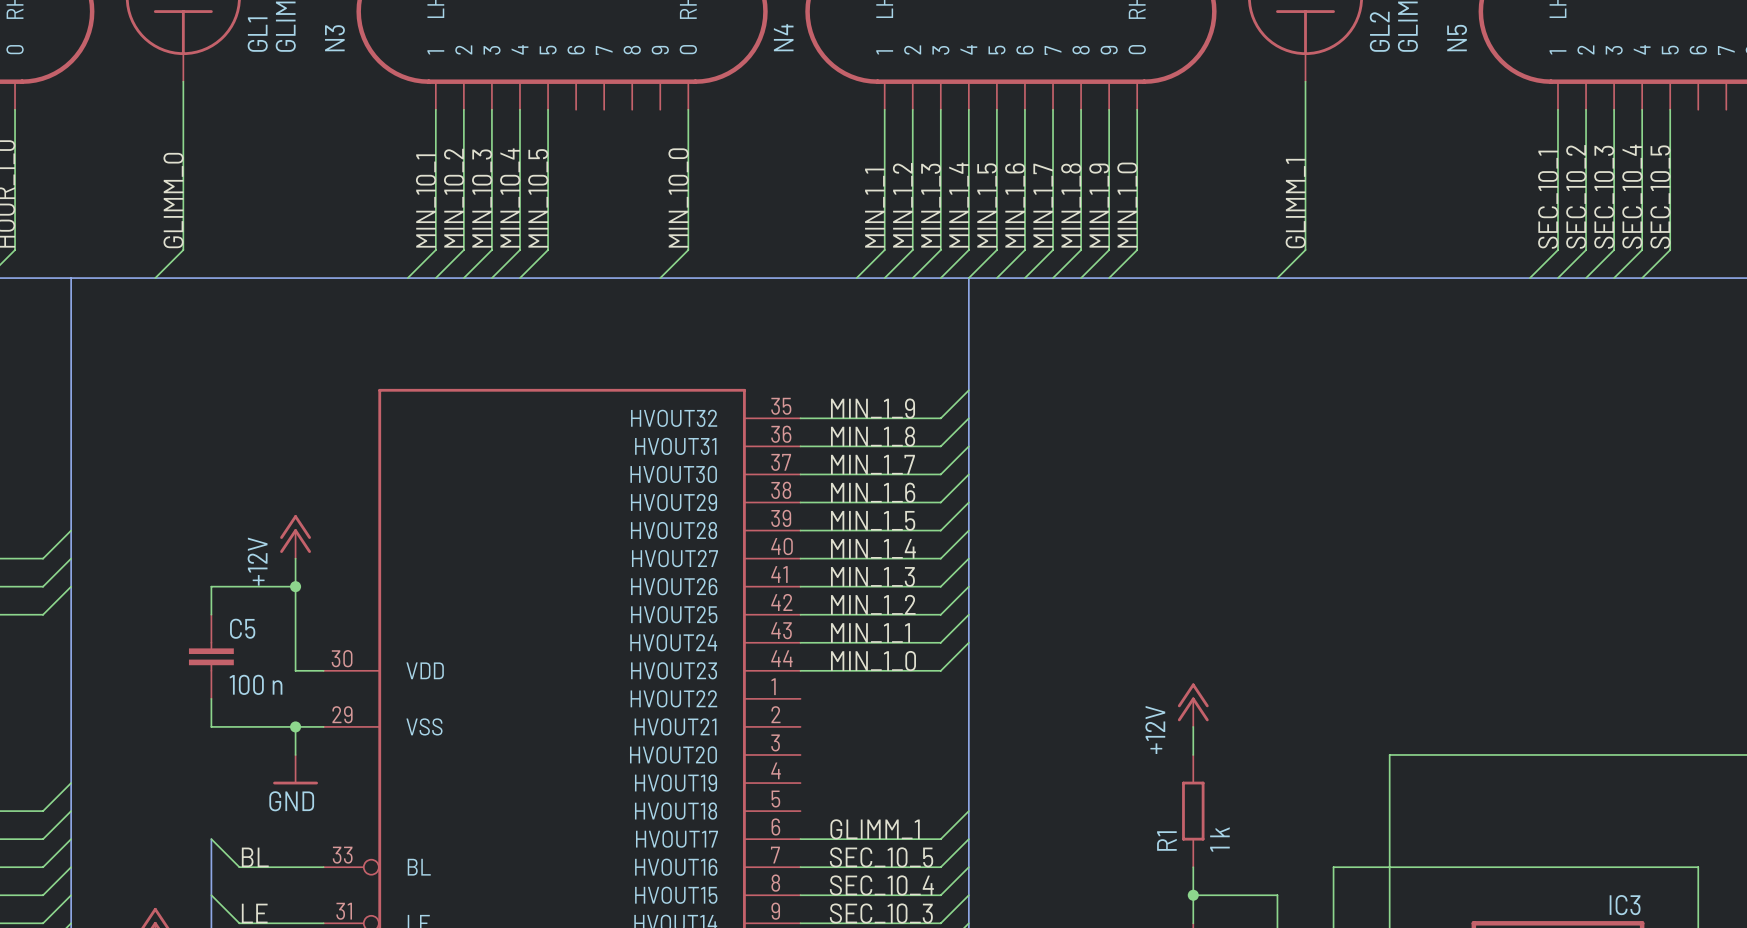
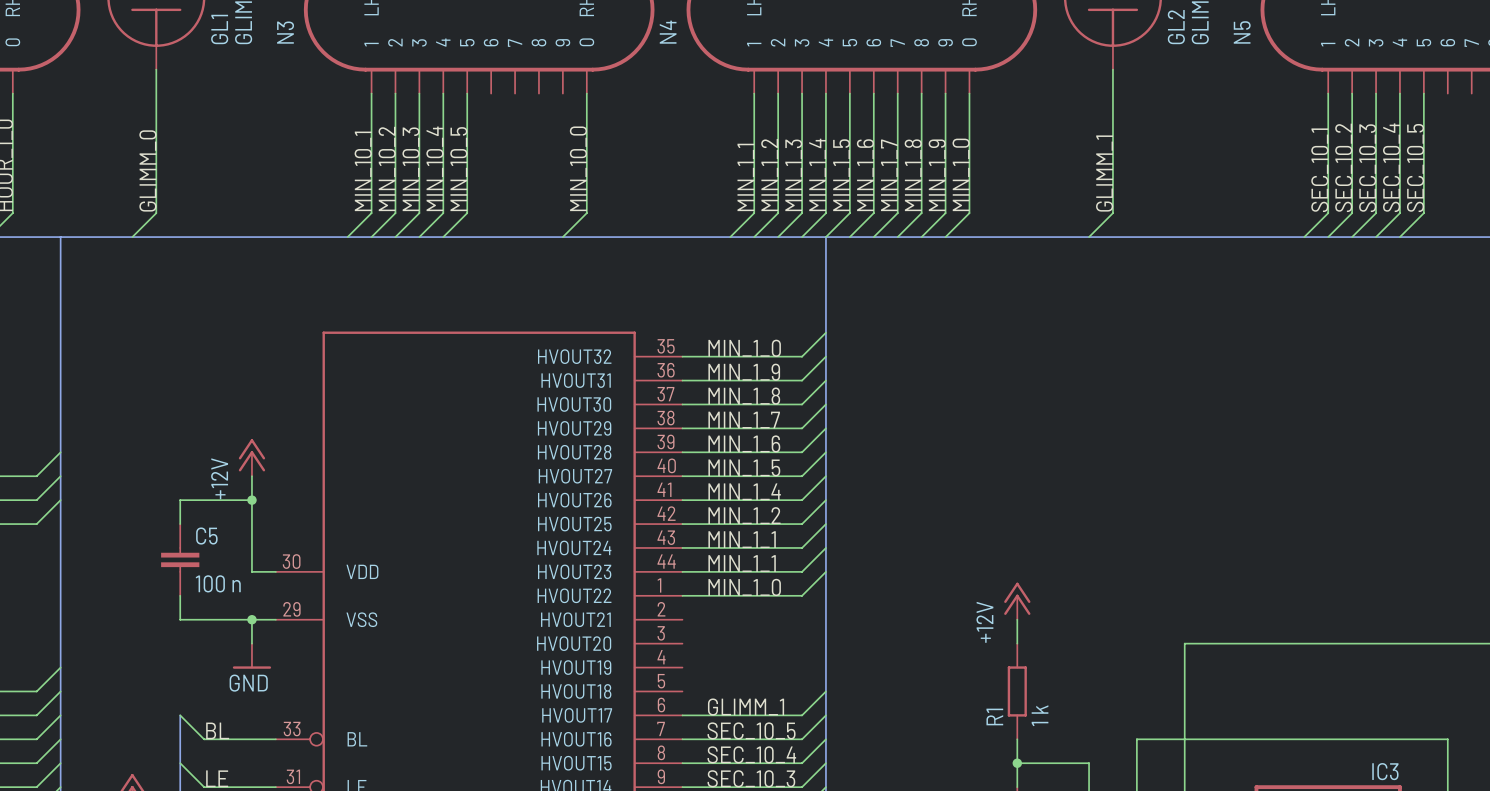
label: MIN_1_9 (873, 408) -> MIN_1_0 (744, 348)
label: MIN_1_8 (873, 436) -> MIN_1_9 (744, 372)
label: MIN_1_7 (872, 464) -> MIN_1_8 (744, 396)
label: MIN_1_6 (873, 492) -> MIN_1_7 (744, 420)
label: MIN_1_5 (873, 520) -> MIN_1_6 (744, 443)
label: MIN_1_4 (873, 548) -> MIN_1_5 (744, 467)
label: MIN_1_3 (872, 576) -> MIN_1_4 (744, 491)
label: MIN_1_0 (873, 661) -> MIN_1_1 (742, 563)
wire: none -> (825, 571) (802, 595) (682, 595)
label: none -> MIN_1_0 (744, 587)

